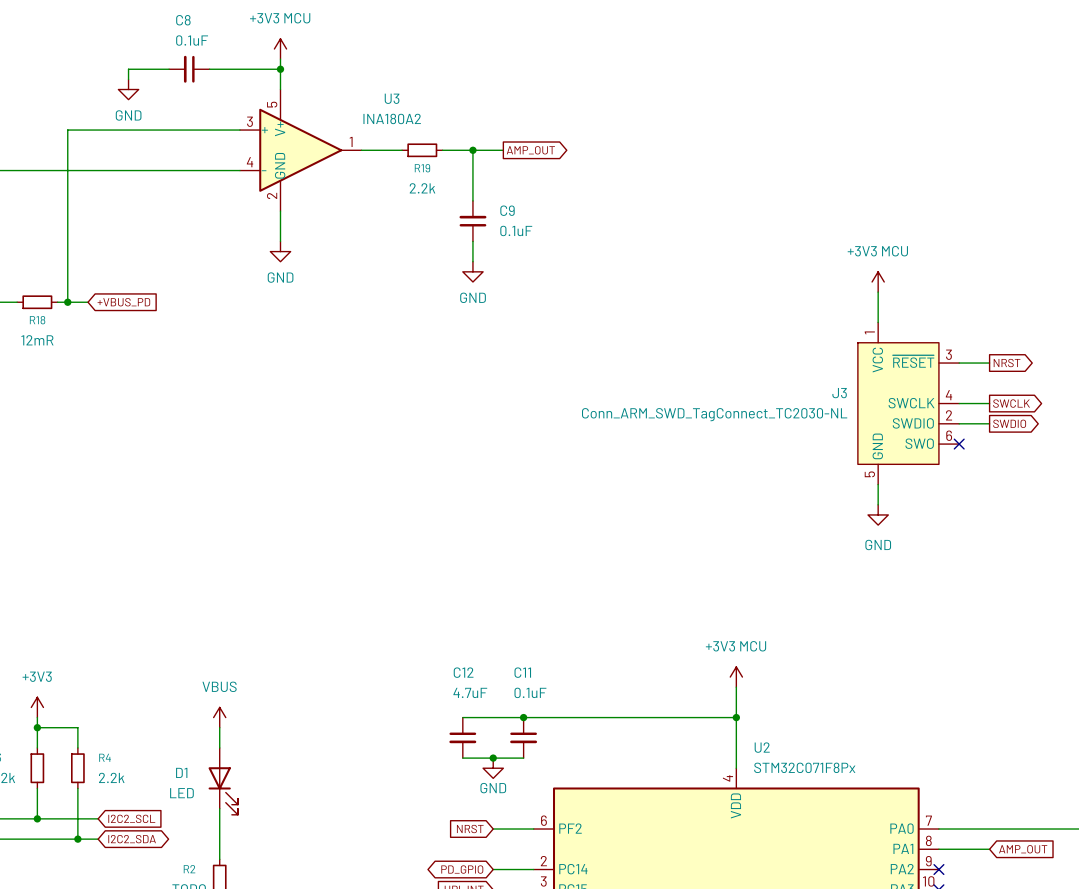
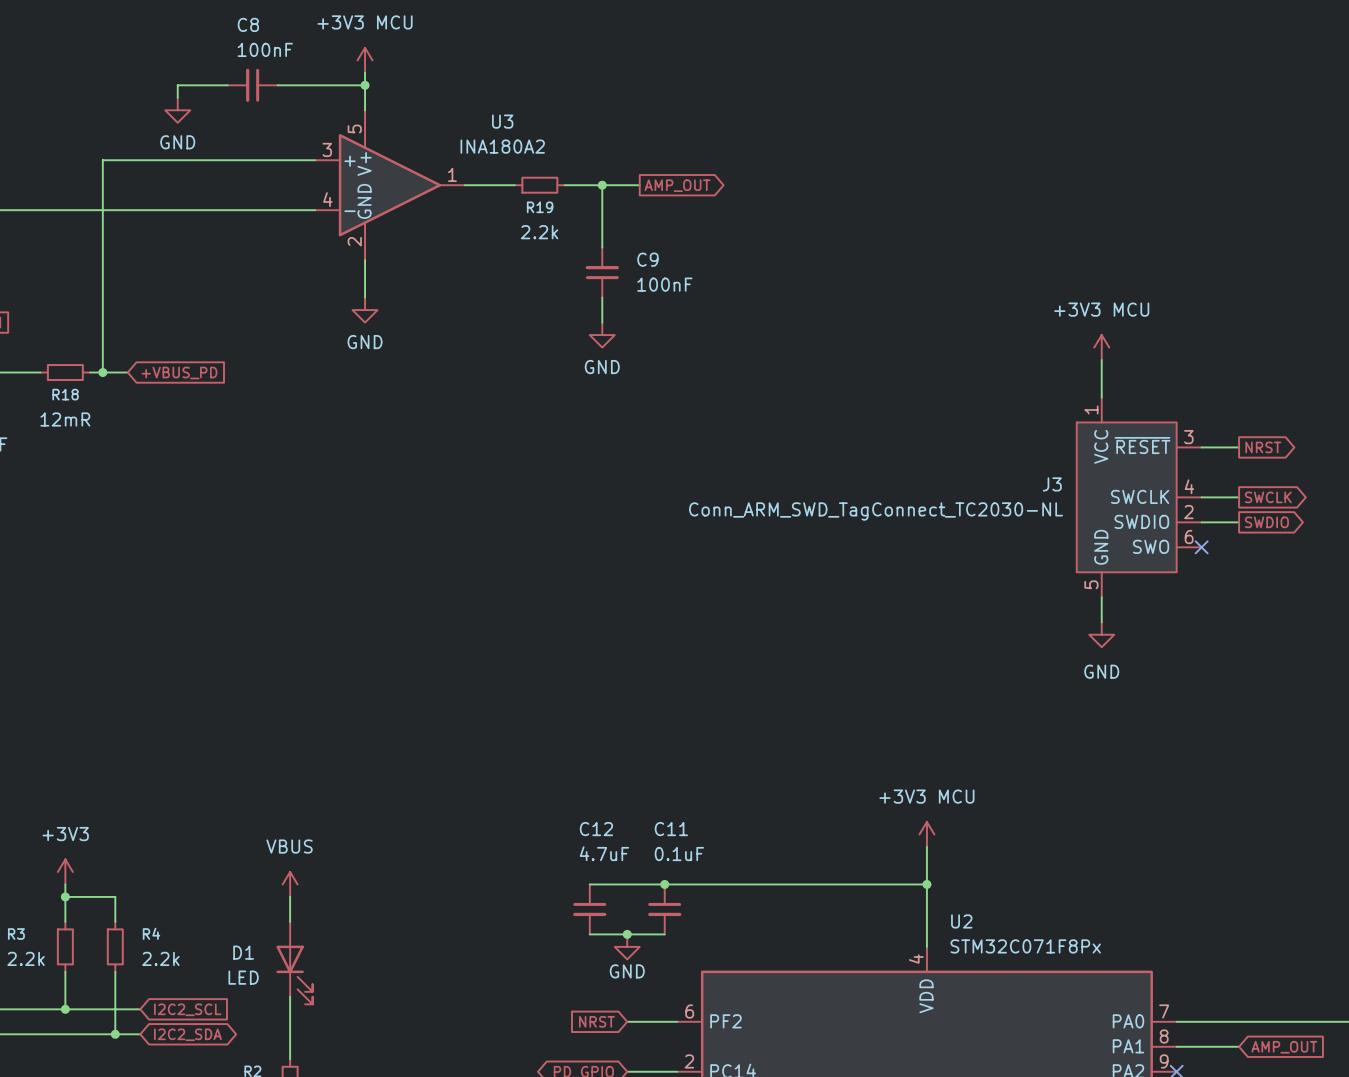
C8 value: 0.1uF (192, 40) -> 100nF (265, 49)
C9 value: 0.1uF (516, 230) -> 100nF (664, 284)

